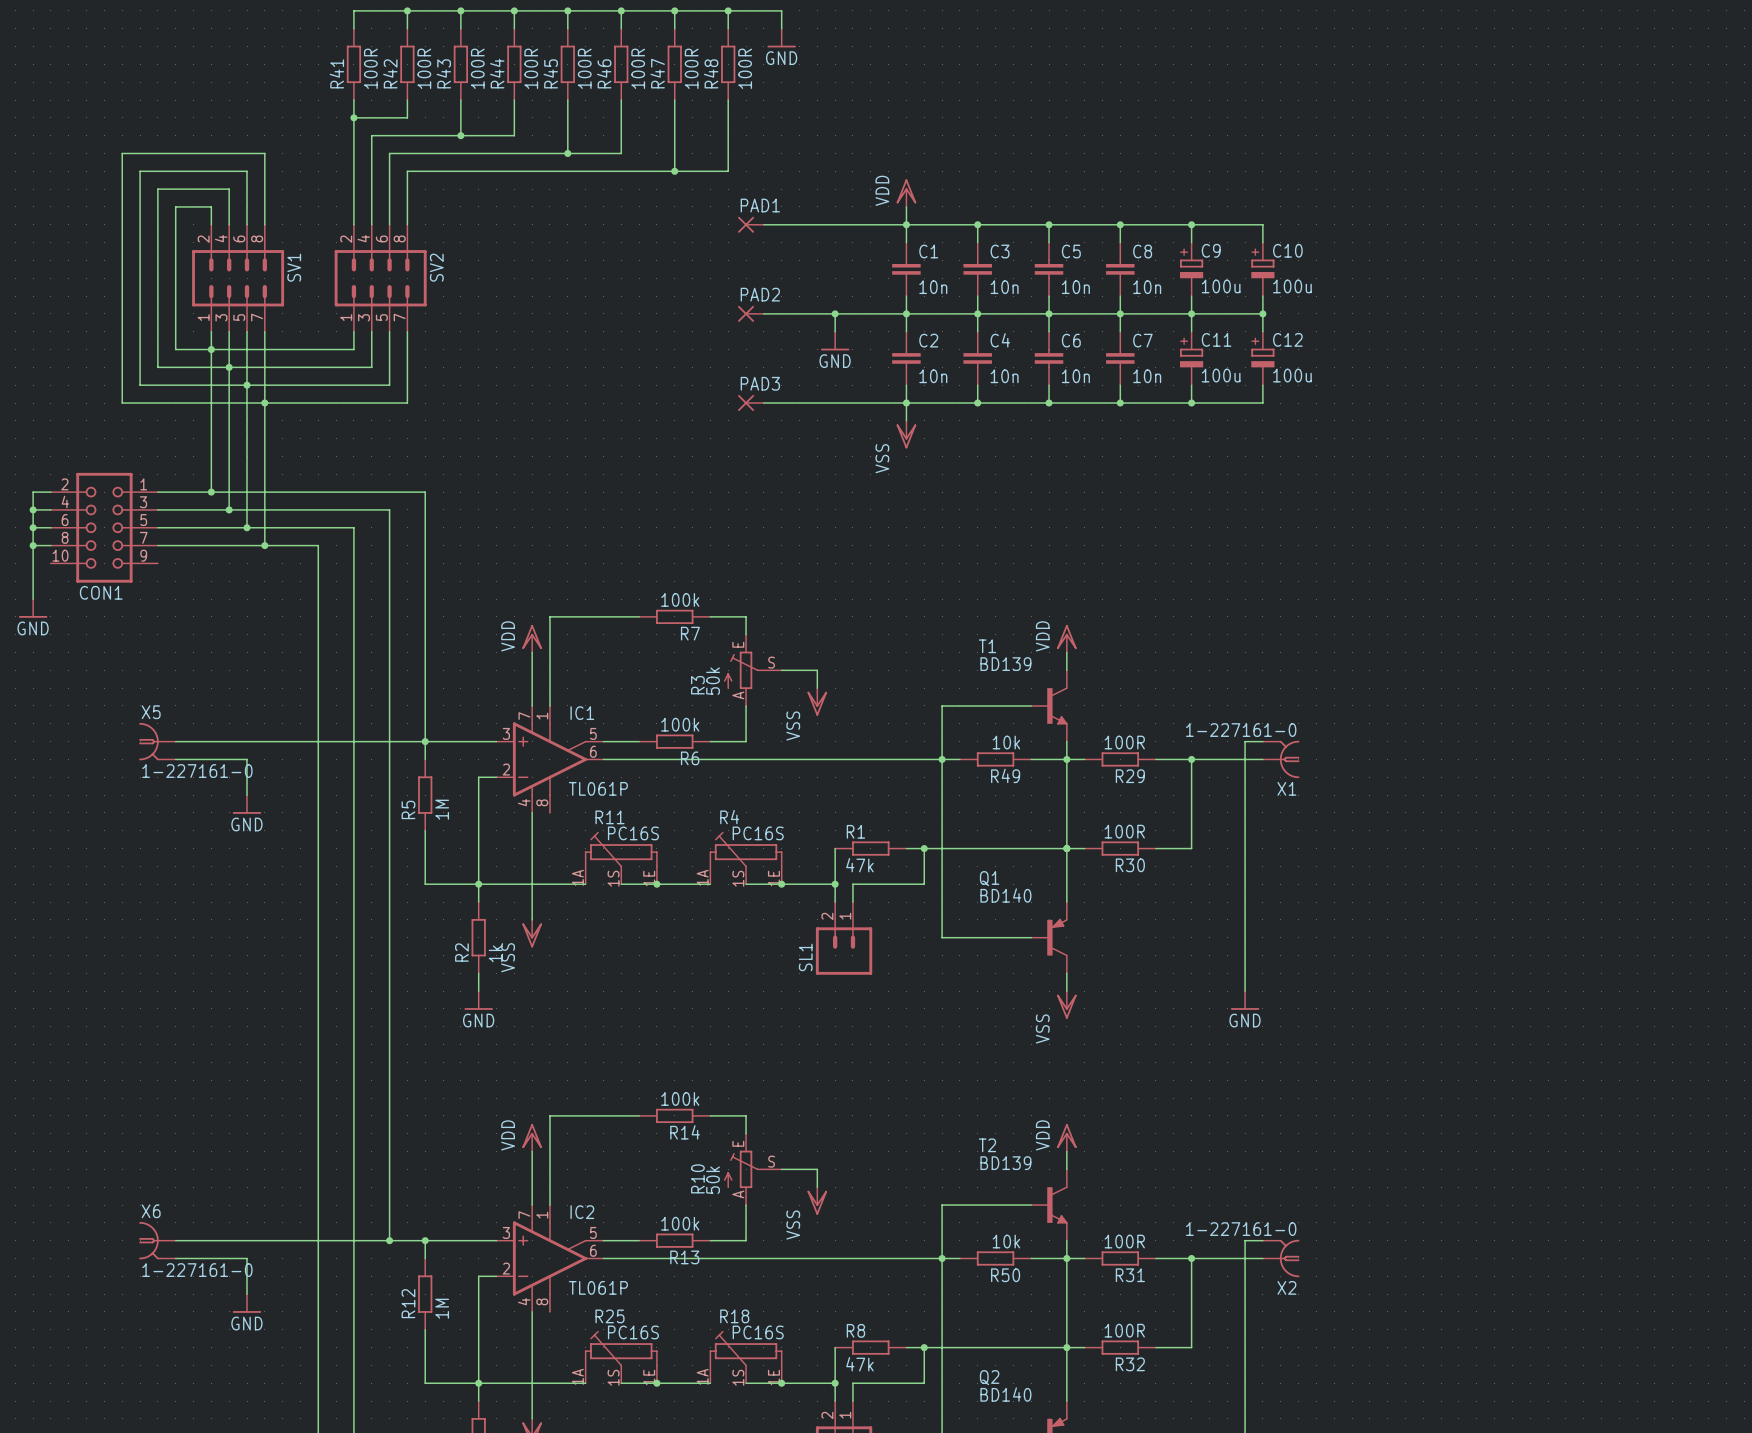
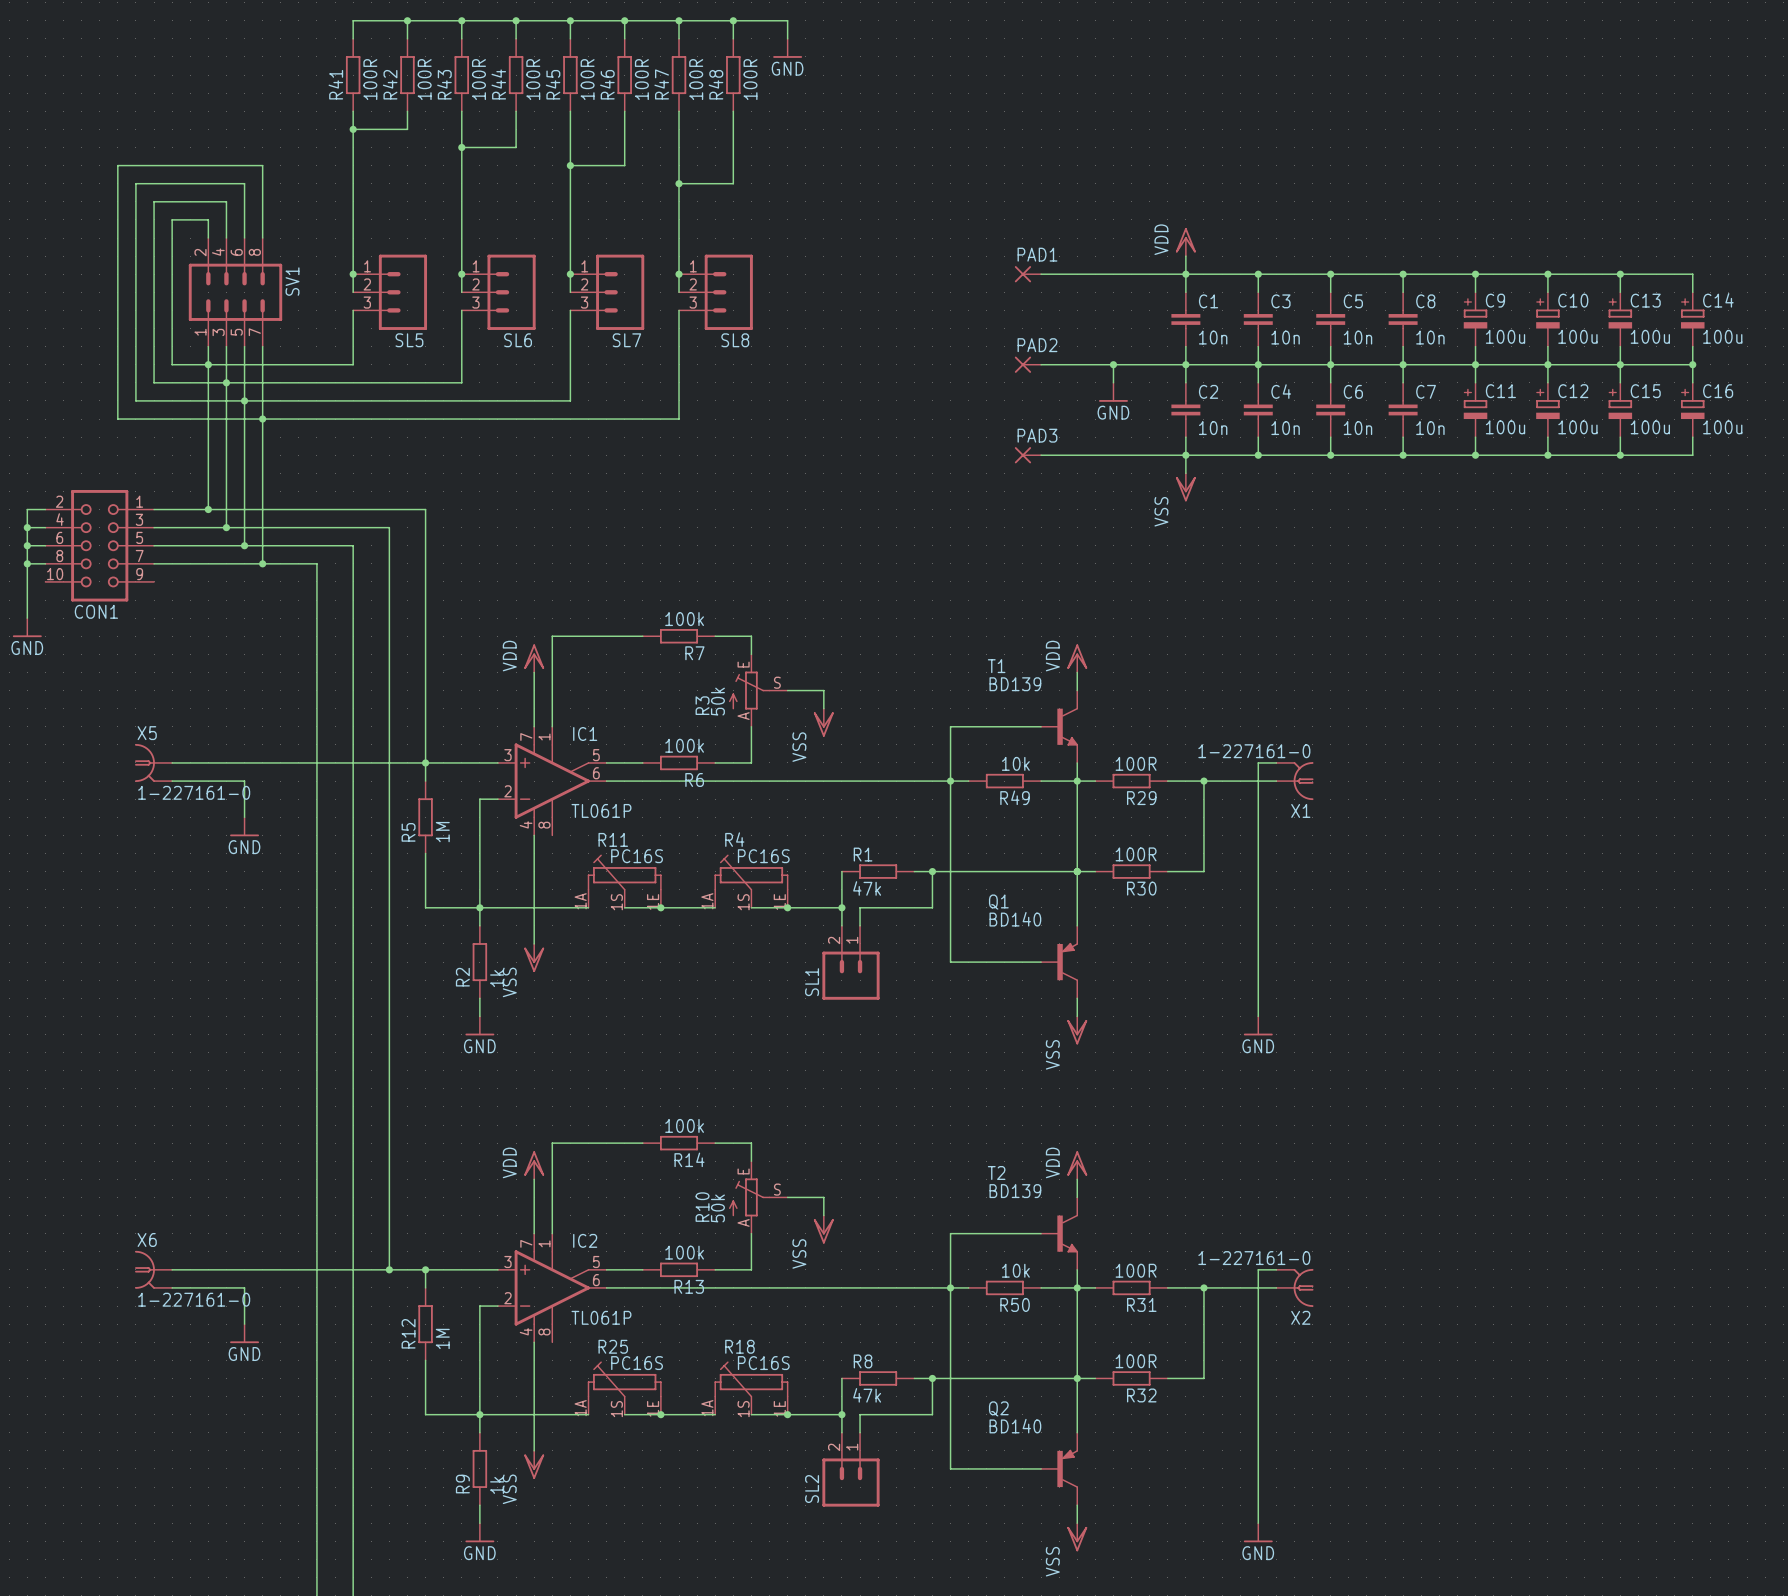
wire: (460, 135) (371, 135) (371, 224) -> (461, 147) (461, 292)
wire: (567, 153) (389, 153) (389, 224) -> (570, 165) (570, 292)
wire: (674, 171) (407, 171) (407, 224) -> (679, 183) (679, 292)
power symbol: VDD (906, 193) -> none
wire: (906, 206) (906, 242) -> none
PAD1 position: (750, 224) -> (1027, 274)
wire: (763, 224) (1262, 224) (1262, 242) -> none
junction: (906, 224) -> none
wire: (977, 224) (977, 242) -> none
junction: (977, 224) -> none
wire: (1049, 224) (1049, 242) -> (1113, 364) (1113, 382)
junction: (1049, 224) -> none
wire: (1120, 224) (1120, 242) -> (1258, 274) (1258, 292)
junction: (1120, 224) -> none
wire: (1191, 224) (1191, 242) -> (1330, 274) (1330, 292)
junction: (1191, 224) -> none
power symbol: none -> VDD (1185, 242)
wire: none -> (1185, 256) (1185, 292)
junction: none -> (353, 274)
junction: none -> (461, 274)
junction: none -> (570, 274)
junction: none -> (679, 274)
wire: none -> (1041, 274) (1692, 274) (1692, 292)
junction: none -> (1185, 274)
junction: none -> (1258, 274)
junction: none -> (1330, 274)
wire: none -> (1403, 274) (1403, 292)
junction: none -> (1403, 274)
wire: none -> (1475, 274) (1475, 292)
junction: none -> (1475, 274)
wire: none -> (1547, 274) (1547, 292)
junction: none -> (1547, 274)
wire: none -> (1620, 274) (1620, 292)
junction: none -> (1620, 274)
C1 position: (906, 269) -> (1185, 319)
C3 position: (977, 269) -> (1258, 319)
C5 position: (1049, 269) -> (1330, 319)
C8 position: (1120, 269) -> (1403, 319)
C9 position: (1191, 269) -> (1475, 319)
C10 position: (1262, 269) -> (1547, 319)
SV2: (380, 278) -> none
SL5: none -> (390, 292)
SL6: none -> (498, 292)
SL7: none -> (607, 292)
SL8: none -> (715, 292)
wire: (906, 296) (906, 331) -> none
wire: (977, 296) (977, 331) -> none
wire: (1049, 296) (1049, 331) -> (1185, 346) (1185, 382)
wire: (1120, 296) (1120, 331) -> (1258, 346) (1258, 382)
wire: (1191, 296) (1191, 331) -> (1330, 346) (1330, 382)
wire: (1262, 296) (1262, 331) -> (1403, 346) (1403, 382)
C13: none -> 100u (1620, 319)
C14: none -> 100u (1692, 319)
PAD2 position: (750, 313) -> (1027, 364)
wire: (763, 313) (1262, 313) -> none
wire: (835, 313) (835, 331) -> none
junction: (835, 313) -> none
junction: (906, 313) -> none
junction: (977, 313) -> none
junction: (1049, 313) -> none
junction: (1120, 313) -> none
junction: (1191, 313) -> none
junction: (1262, 313) -> none
wire: (371, 331) (371, 367) -> (461, 310) (461, 382) (371, 382)
wire: (389, 331) (389, 385) -> (570, 310) (570, 400) (389, 400)
wire: (407, 331) (407, 403) -> (679, 310) (679, 419) (407, 419)
wire: none -> (1475, 346) (1475, 382)
wire: none -> (1547, 346) (1547, 382)
wire: none -> (1620, 346) (1620, 382)
wire: none -> (1692, 346) (1692, 382)
power symbol: GND (835, 341) -> none
wire: none -> (1041, 364) (1692, 364)
junction: none -> (1113, 364)
junction: none -> (1185, 364)
junction: none -> (1258, 364)
junction: none -> (1330, 364)
junction: none -> (1403, 364)
junction: none -> (1475, 364)
junction: none -> (1547, 364)
junction: none -> (1620, 364)
junction: none -> (1692, 364)
C2 position: (906, 358) -> (1185, 409)
C4 position: (977, 358) -> (1258, 409)
C6 position: (1049, 358) -> (1330, 409)
C7 position: (1120, 358) -> (1403, 409)
C11 position: (1191, 358) -> (1475, 409)
C12 position: (1262, 358) -> (1547, 409)
power symbol: none -> GND (1113, 392)
wire: (906, 385) (906, 420) -> none
wire: (977, 385) (977, 403) -> none
wire: (1049, 385) (1049, 403) -> none
wire: (1120, 385) (1120, 403) -> (1258, 437) (1258, 455)
wire: (1191, 385) (1191, 403) -> (1330, 437) (1330, 455)
wire: (1262, 385) (1262, 403) (763, 403) -> none
C15: none -> 100u (1620, 409)
C16: none -> 100u (1692, 409)
PAD3 position: (750, 403) -> (1027, 455)
junction: (906, 403) -> none
junction: (977, 403) -> none
junction: (1049, 403) -> none
junction: (1120, 403) -> none
junction: (1191, 403) -> none
wire: none -> (1185, 437) (1185, 473)
wire: none -> (1403, 437) (1403, 455)
wire: none -> (1475, 437) (1475, 455)
wire: none -> (1547, 437) (1547, 455)
wire: none -> (1620, 437) (1620, 455)
wire: none -> (1692, 437) (1692, 455) (1041, 455)
power symbol: VSS (906, 434) -> none
junction: none -> (1185, 455)
junction: none -> (1258, 455)
junction: none -> (1330, 455)
junction: none -> (1403, 455)
junction: none -> (1475, 455)
junction: none -> (1547, 455)
junction: none -> (1620, 455)
power symbol: none -> VSS (1185, 487)

